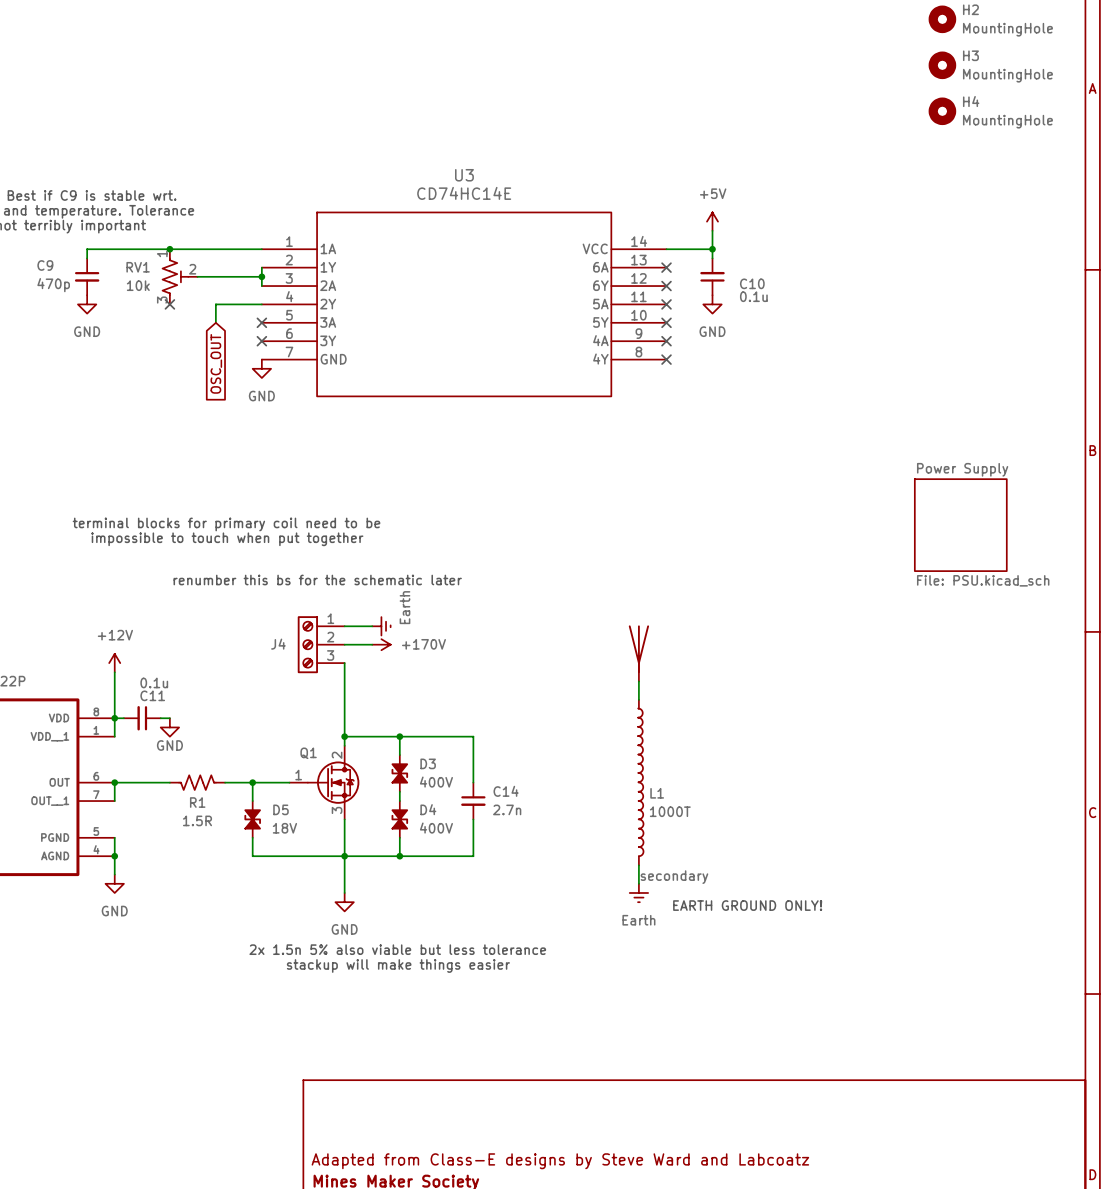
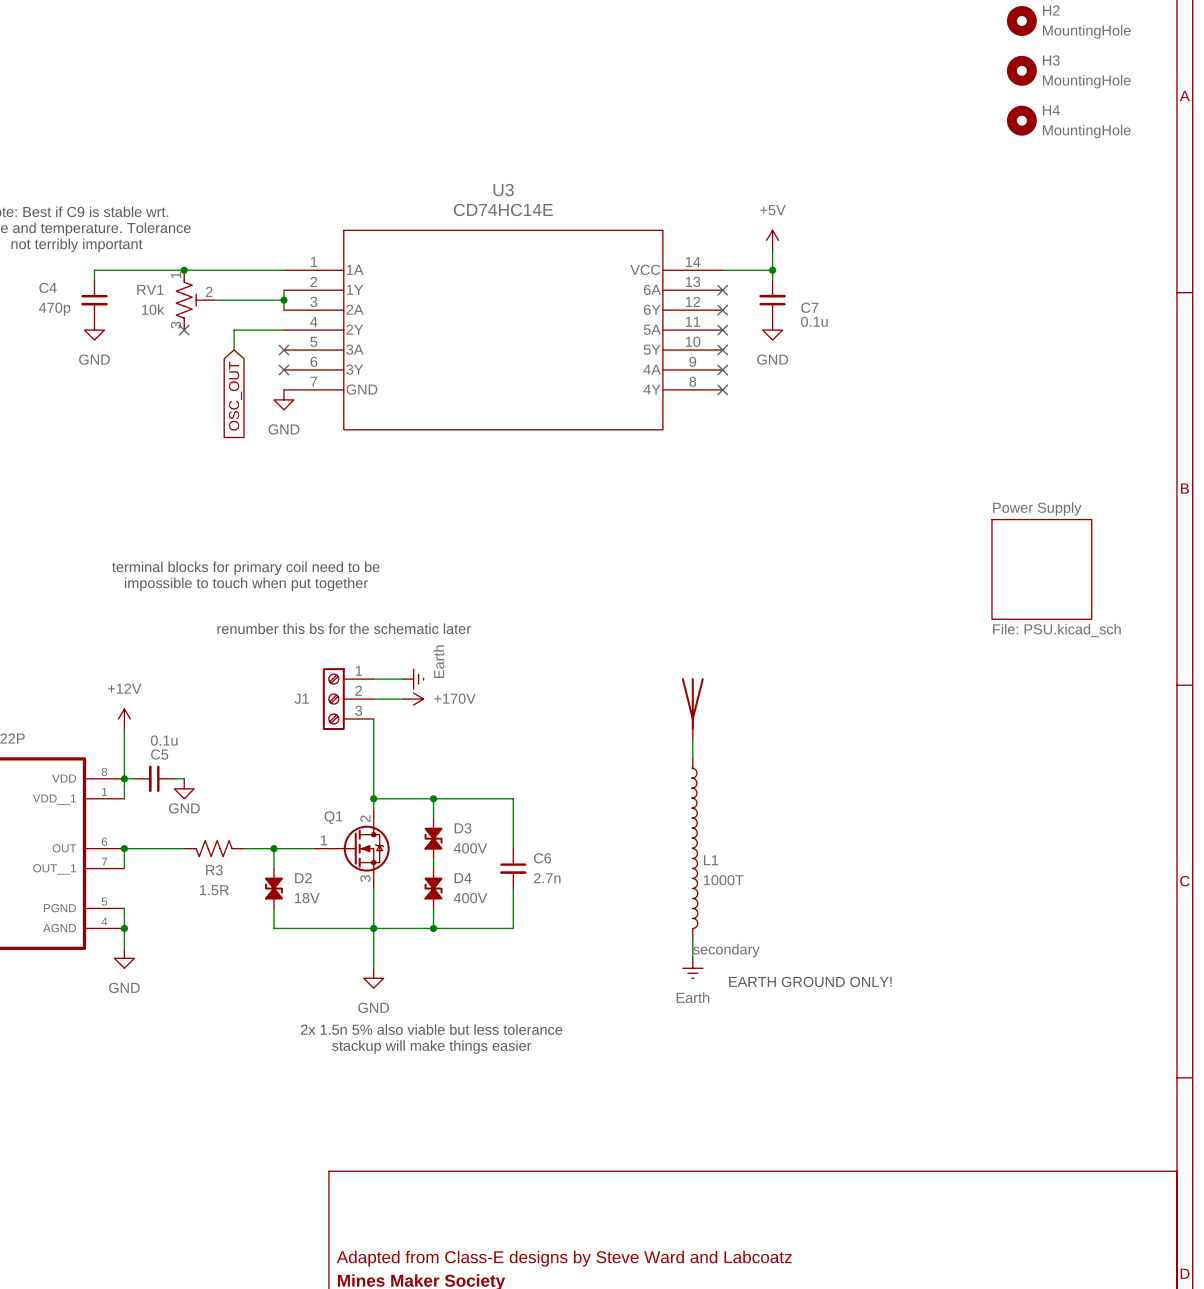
C9 name: C9 (45, 265) -> C4 (48, 287)
C10 name: C10 (752, 283) -> C7 (809, 307)
J4 name: J4 (278, 644) -> J1 (301, 698)
C11 name: C11 (152, 695) -> C5 (159, 754)
C14 name: C14 (506, 791) -> C6 (542, 858)
R1 name: R1 (197, 802) -> R3 (214, 870)
D5 name: D5 (280, 809) -> D2 (303, 878)

